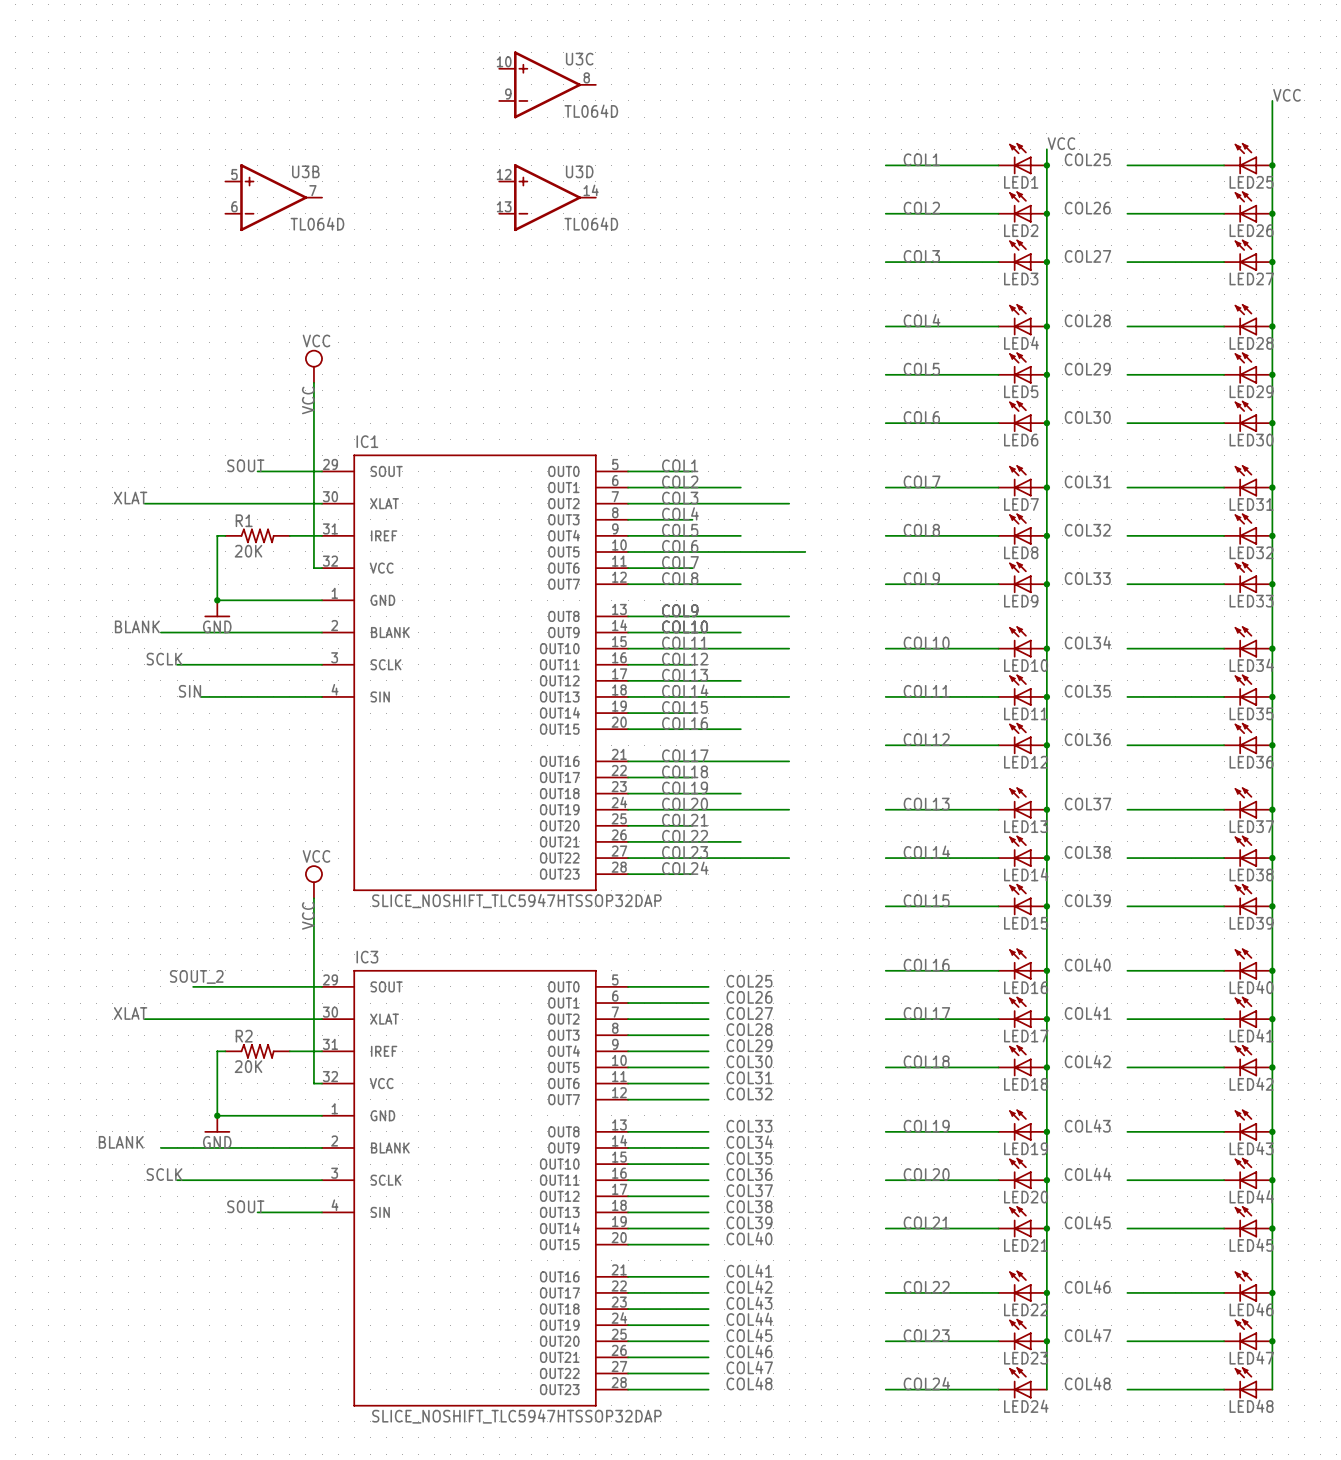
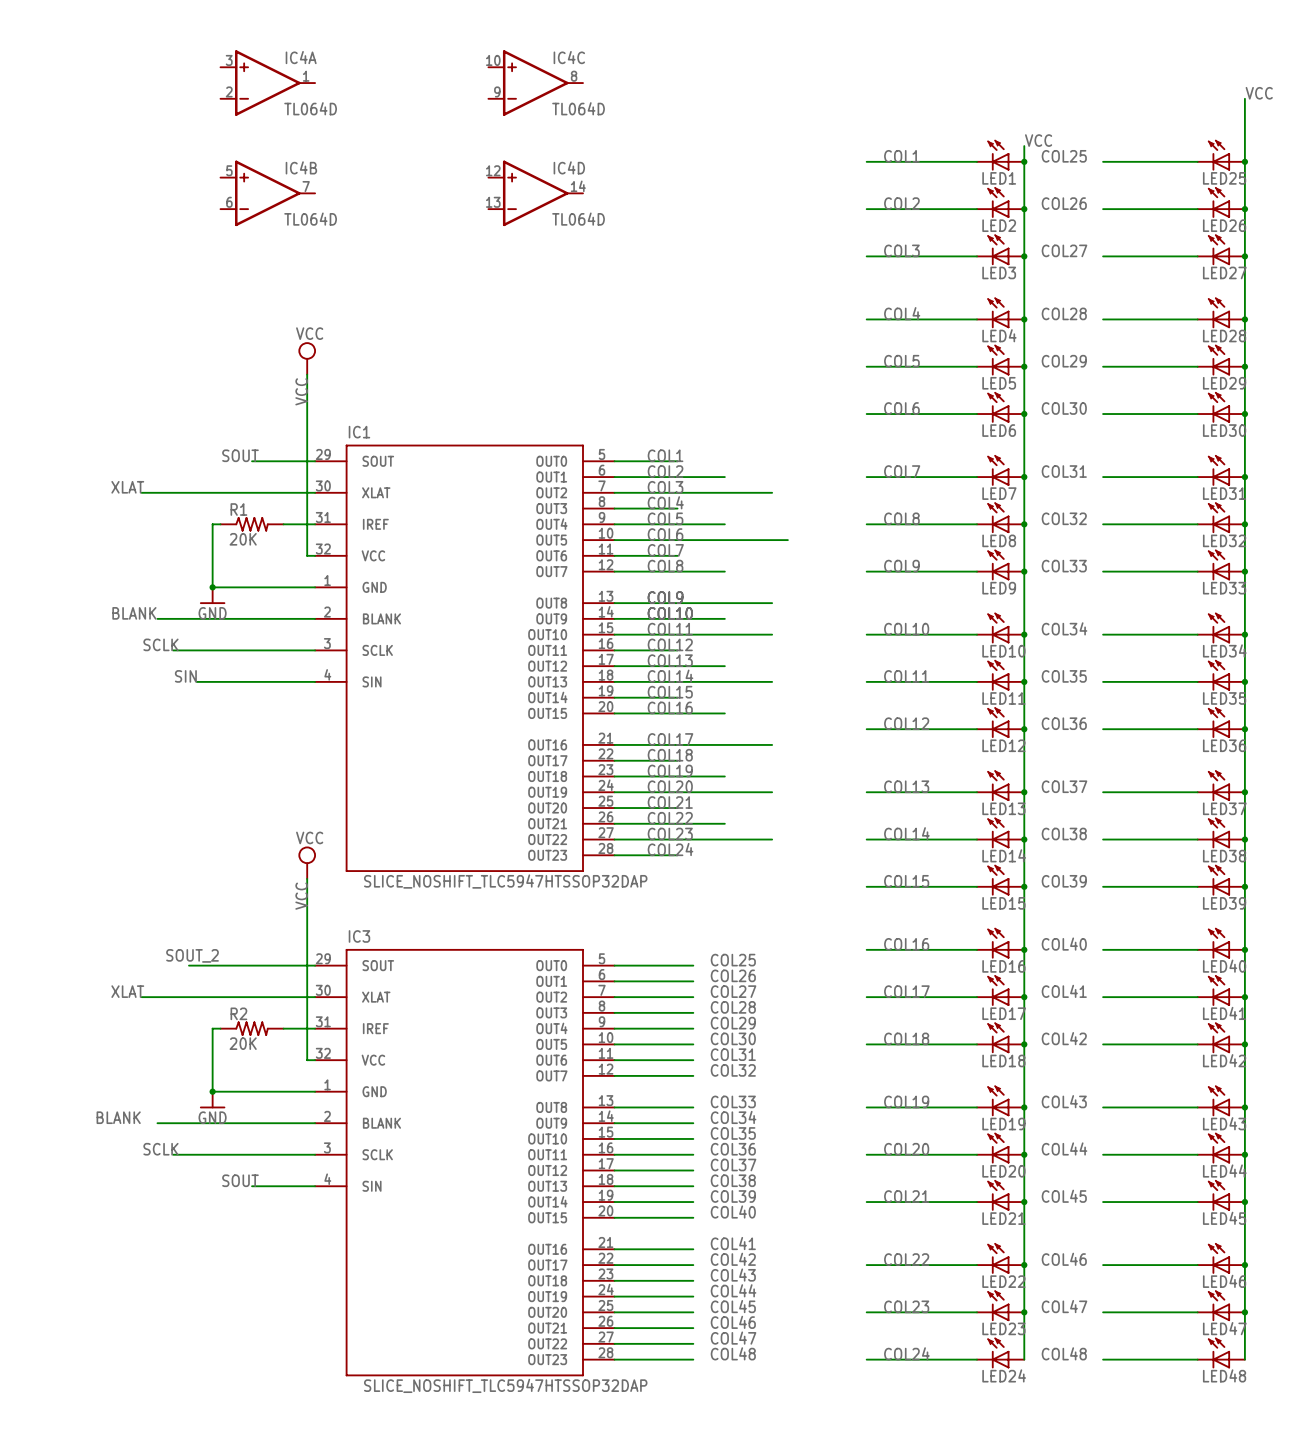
U3C name: U3C (579, 59) -> IC4C (569, 57)
IC4A: none -> TL064D (267, 83)
U3B name: U3B (305, 171) -> IC4B (301, 167)
U3D name: U3D (579, 171) -> IC4D (569, 167)

